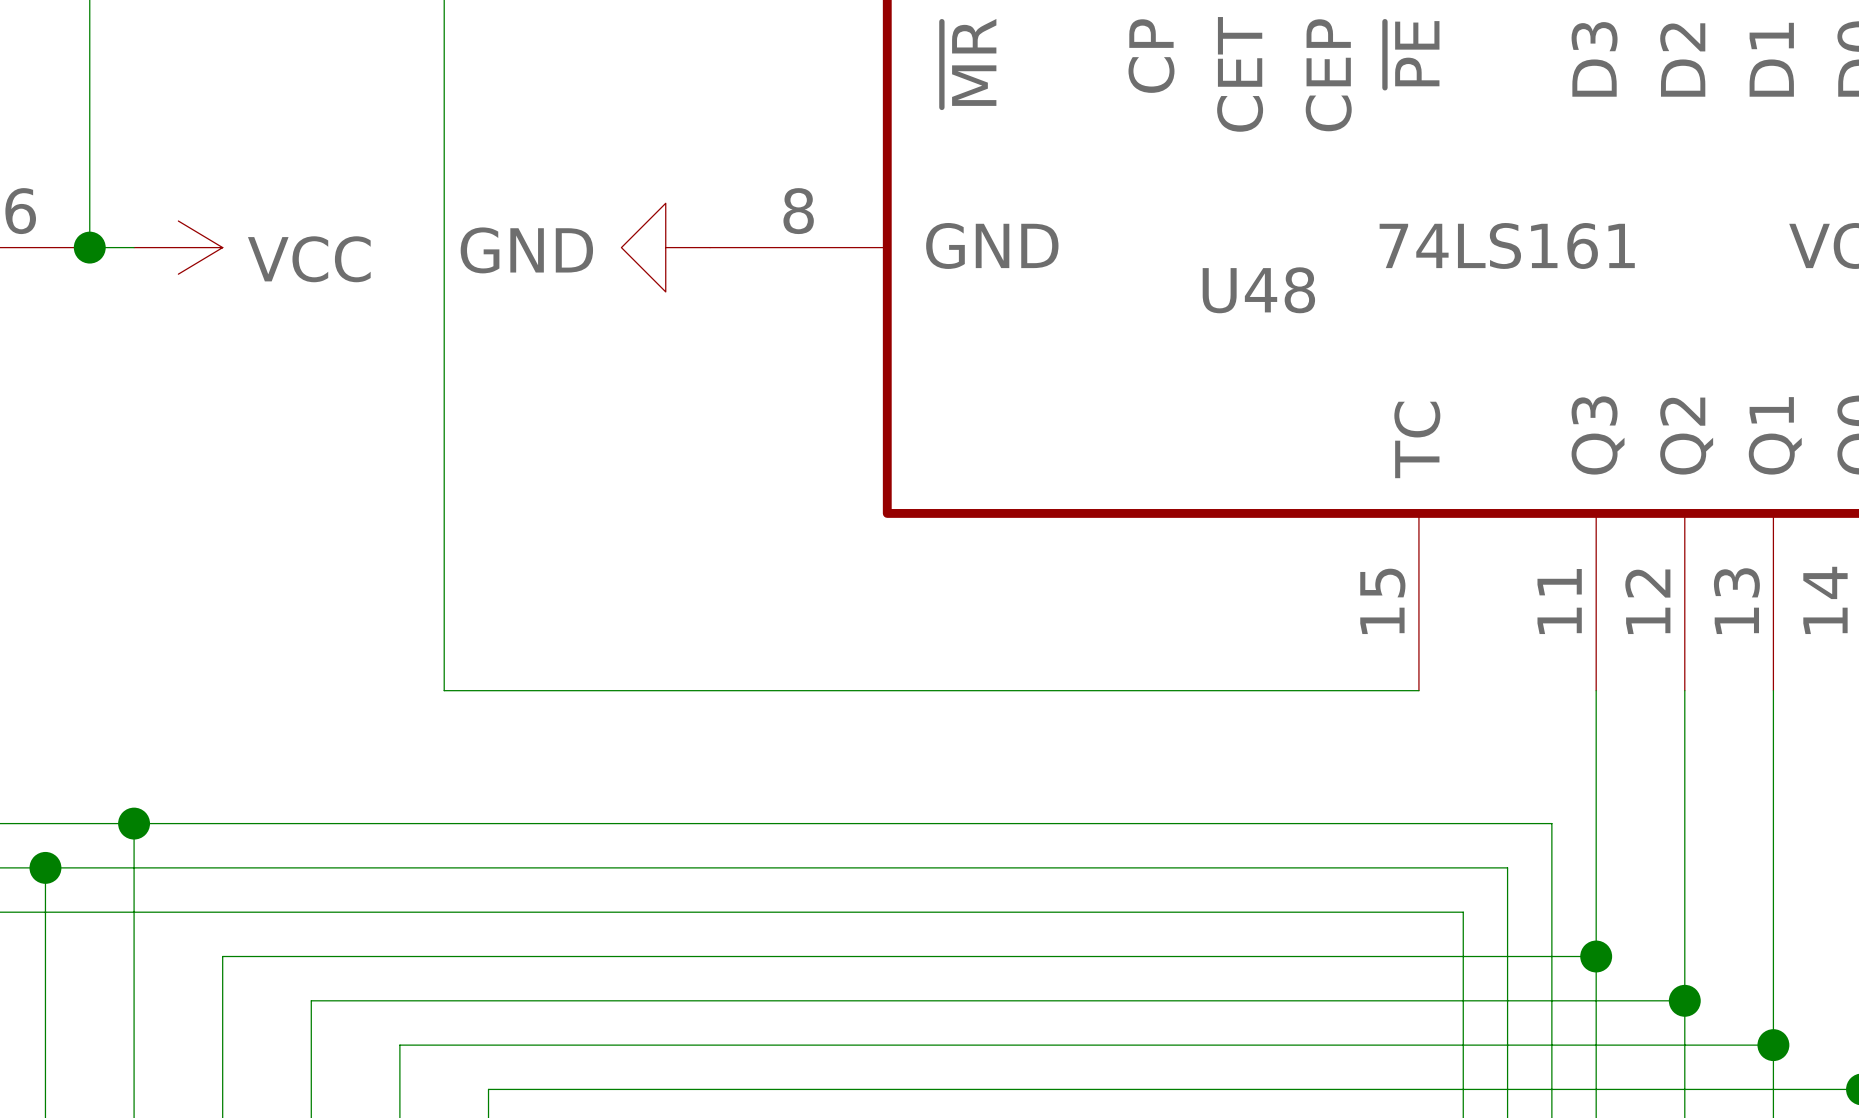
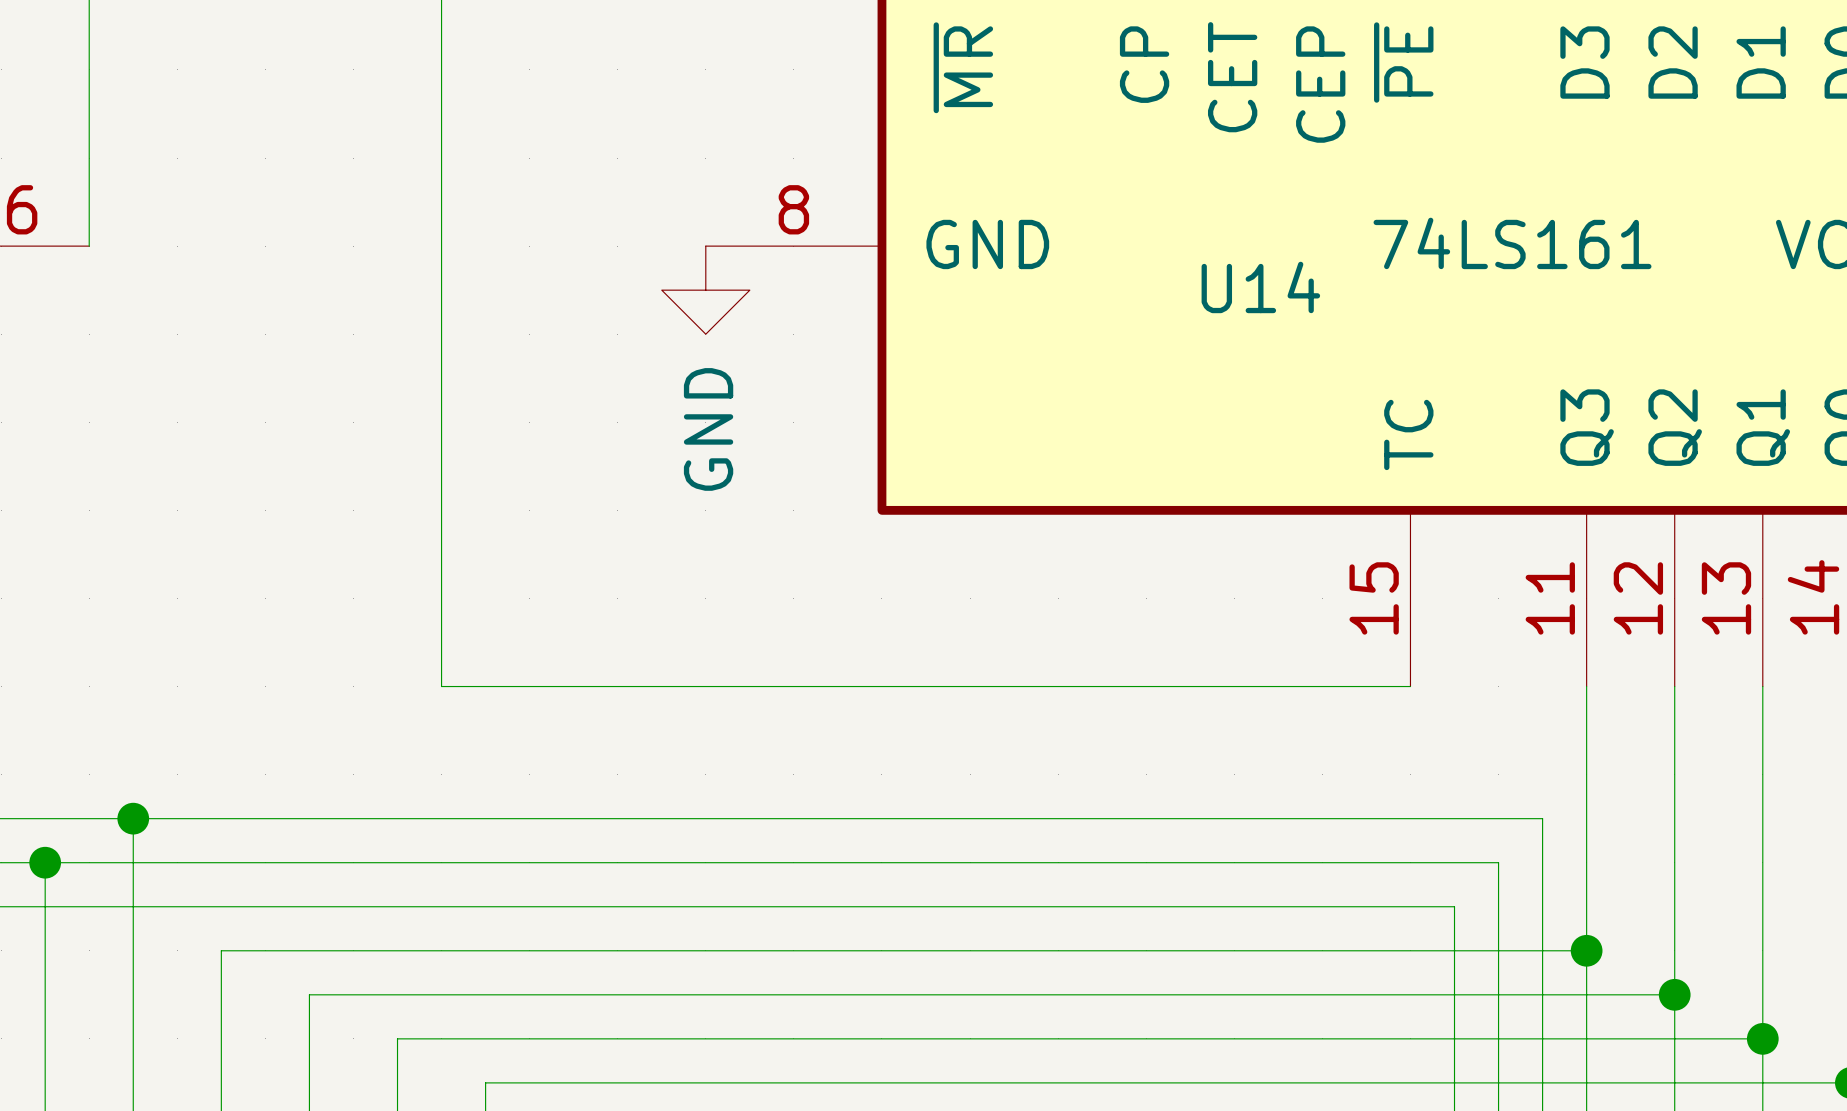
wire: (89, 247) (134, 247) -> none
junction: (89, 247) -> none
power symbol: VCC (178, 247) -> none
power symbol rotation: 0° (665, 247) -> 90° counterclockwise (705, 290)
power symbol position: GND (665, 247) -> GND (705, 290)
U48 name: U48 (1258, 290) -> U14 (1260, 287)

